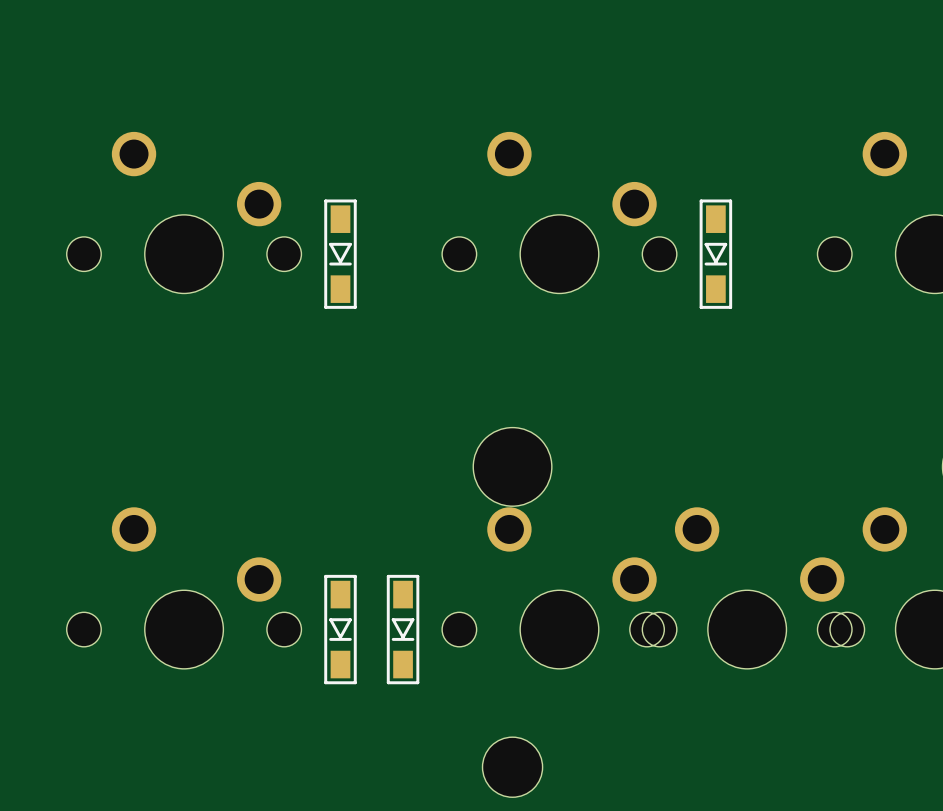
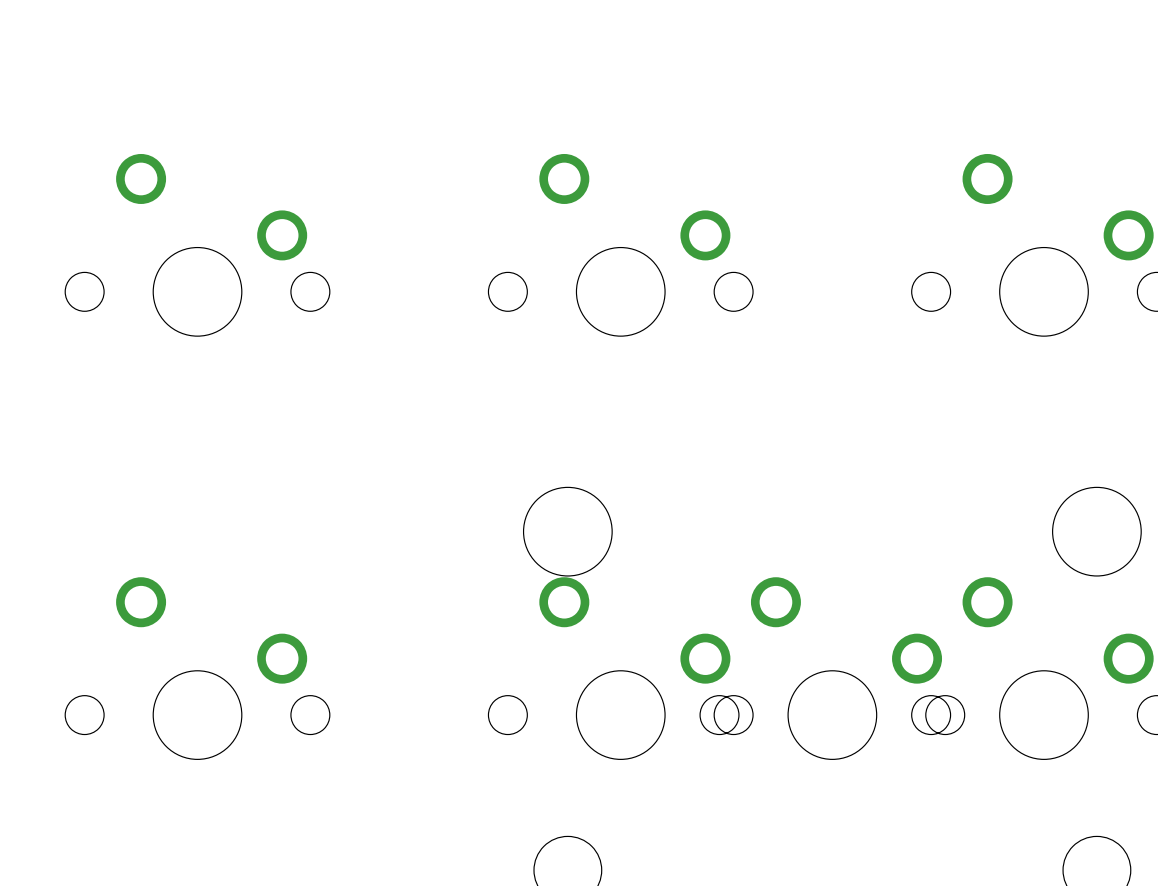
part: (340, 254) -> none
part: (715, 254) -> none
part: (340, 629) -> none
part: (403, 629) -> none

